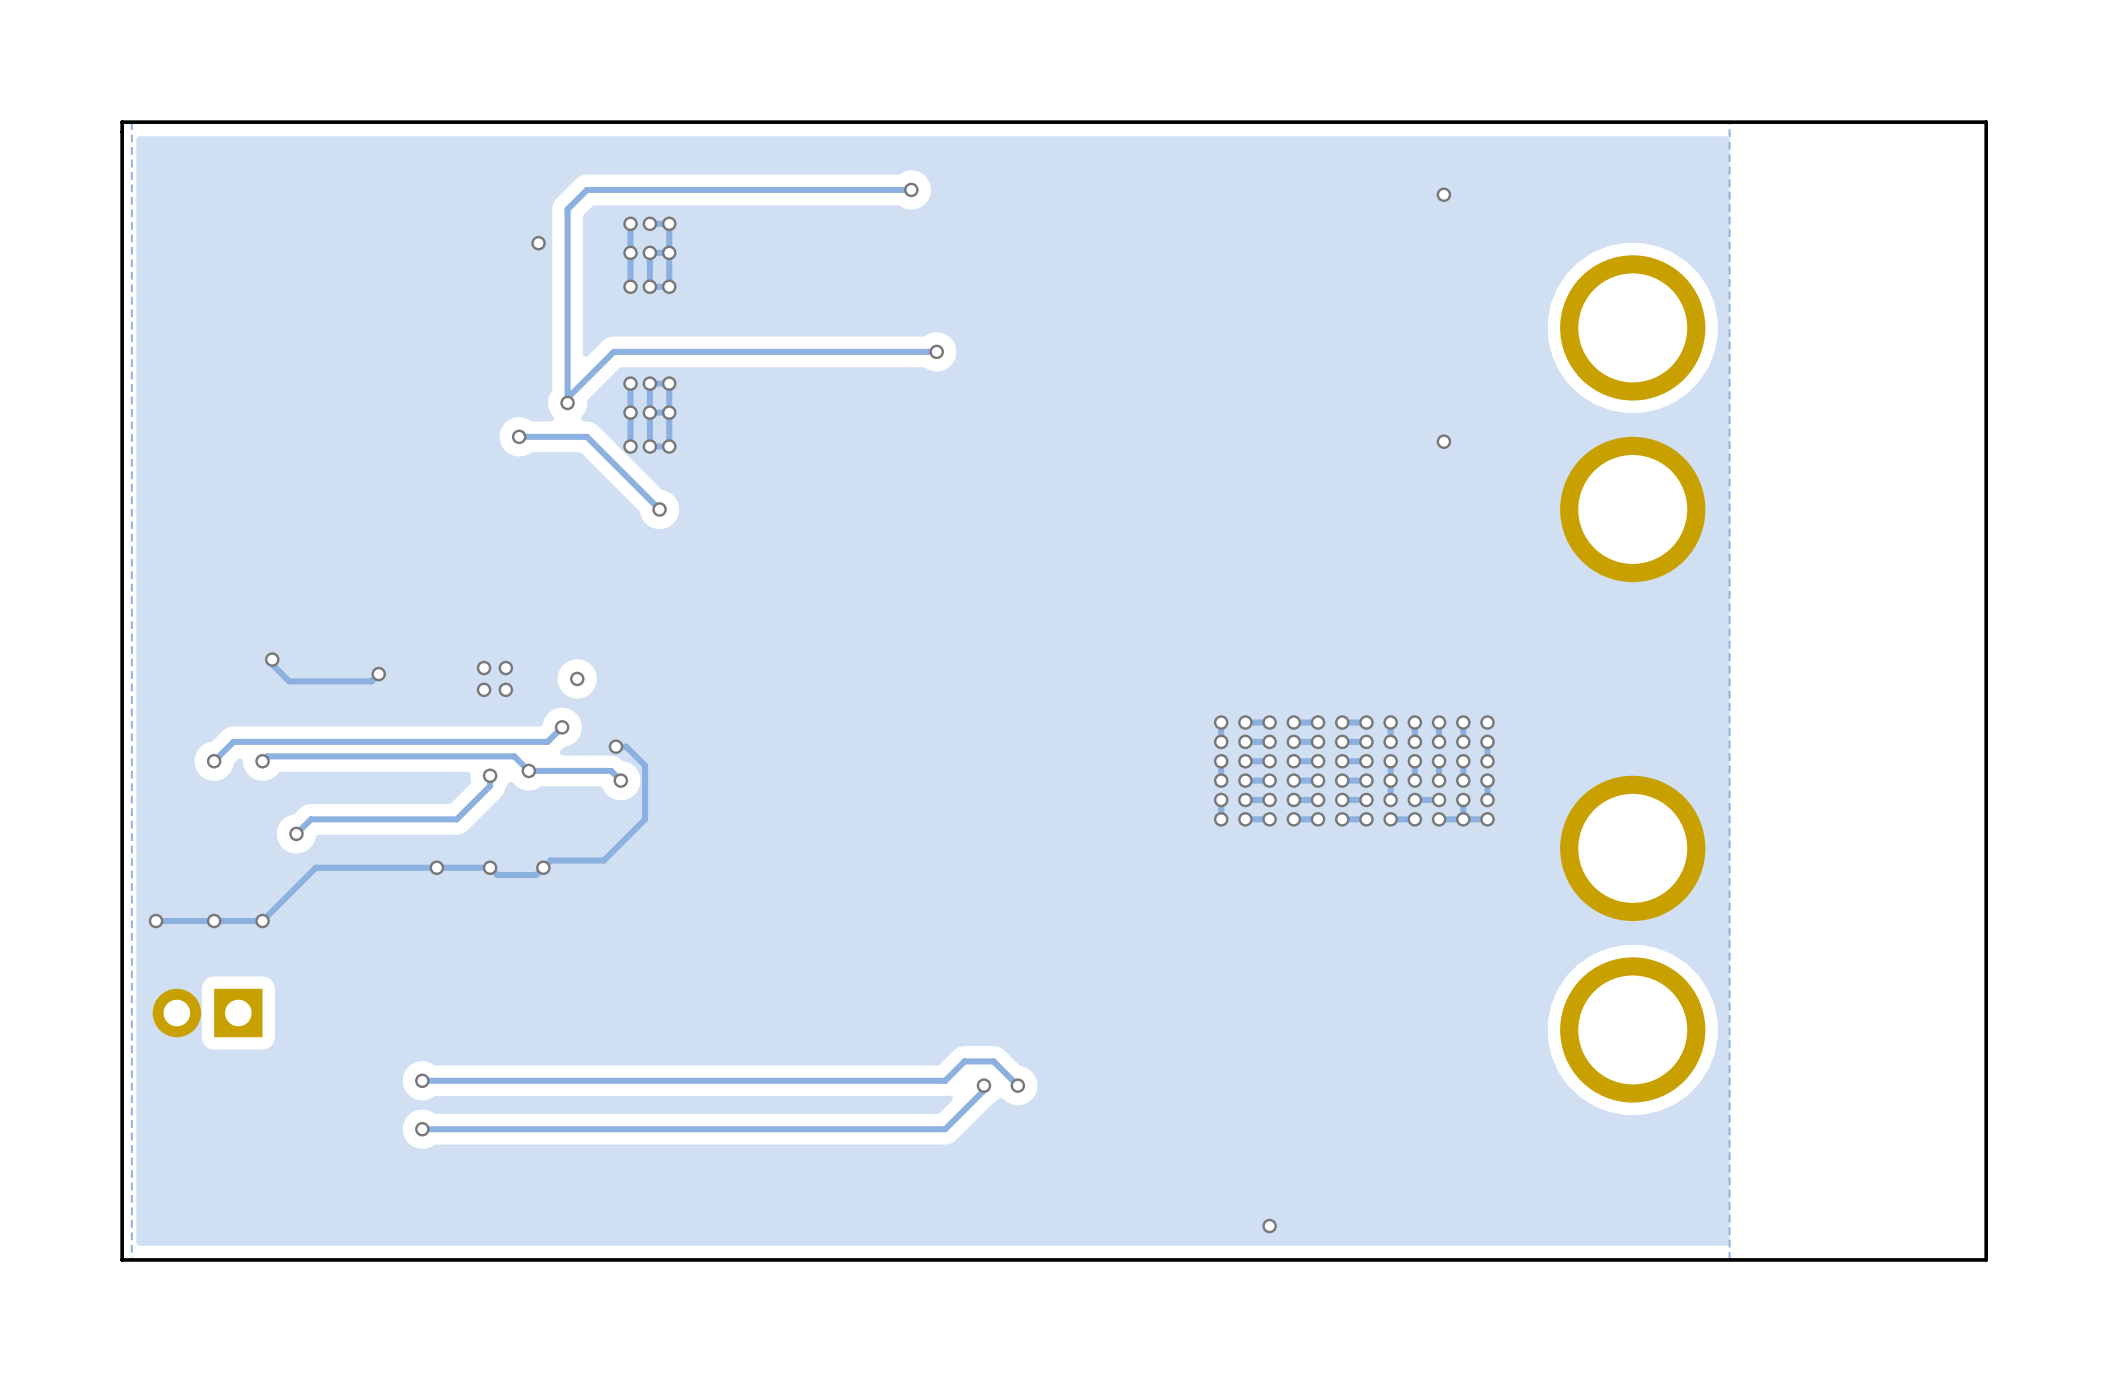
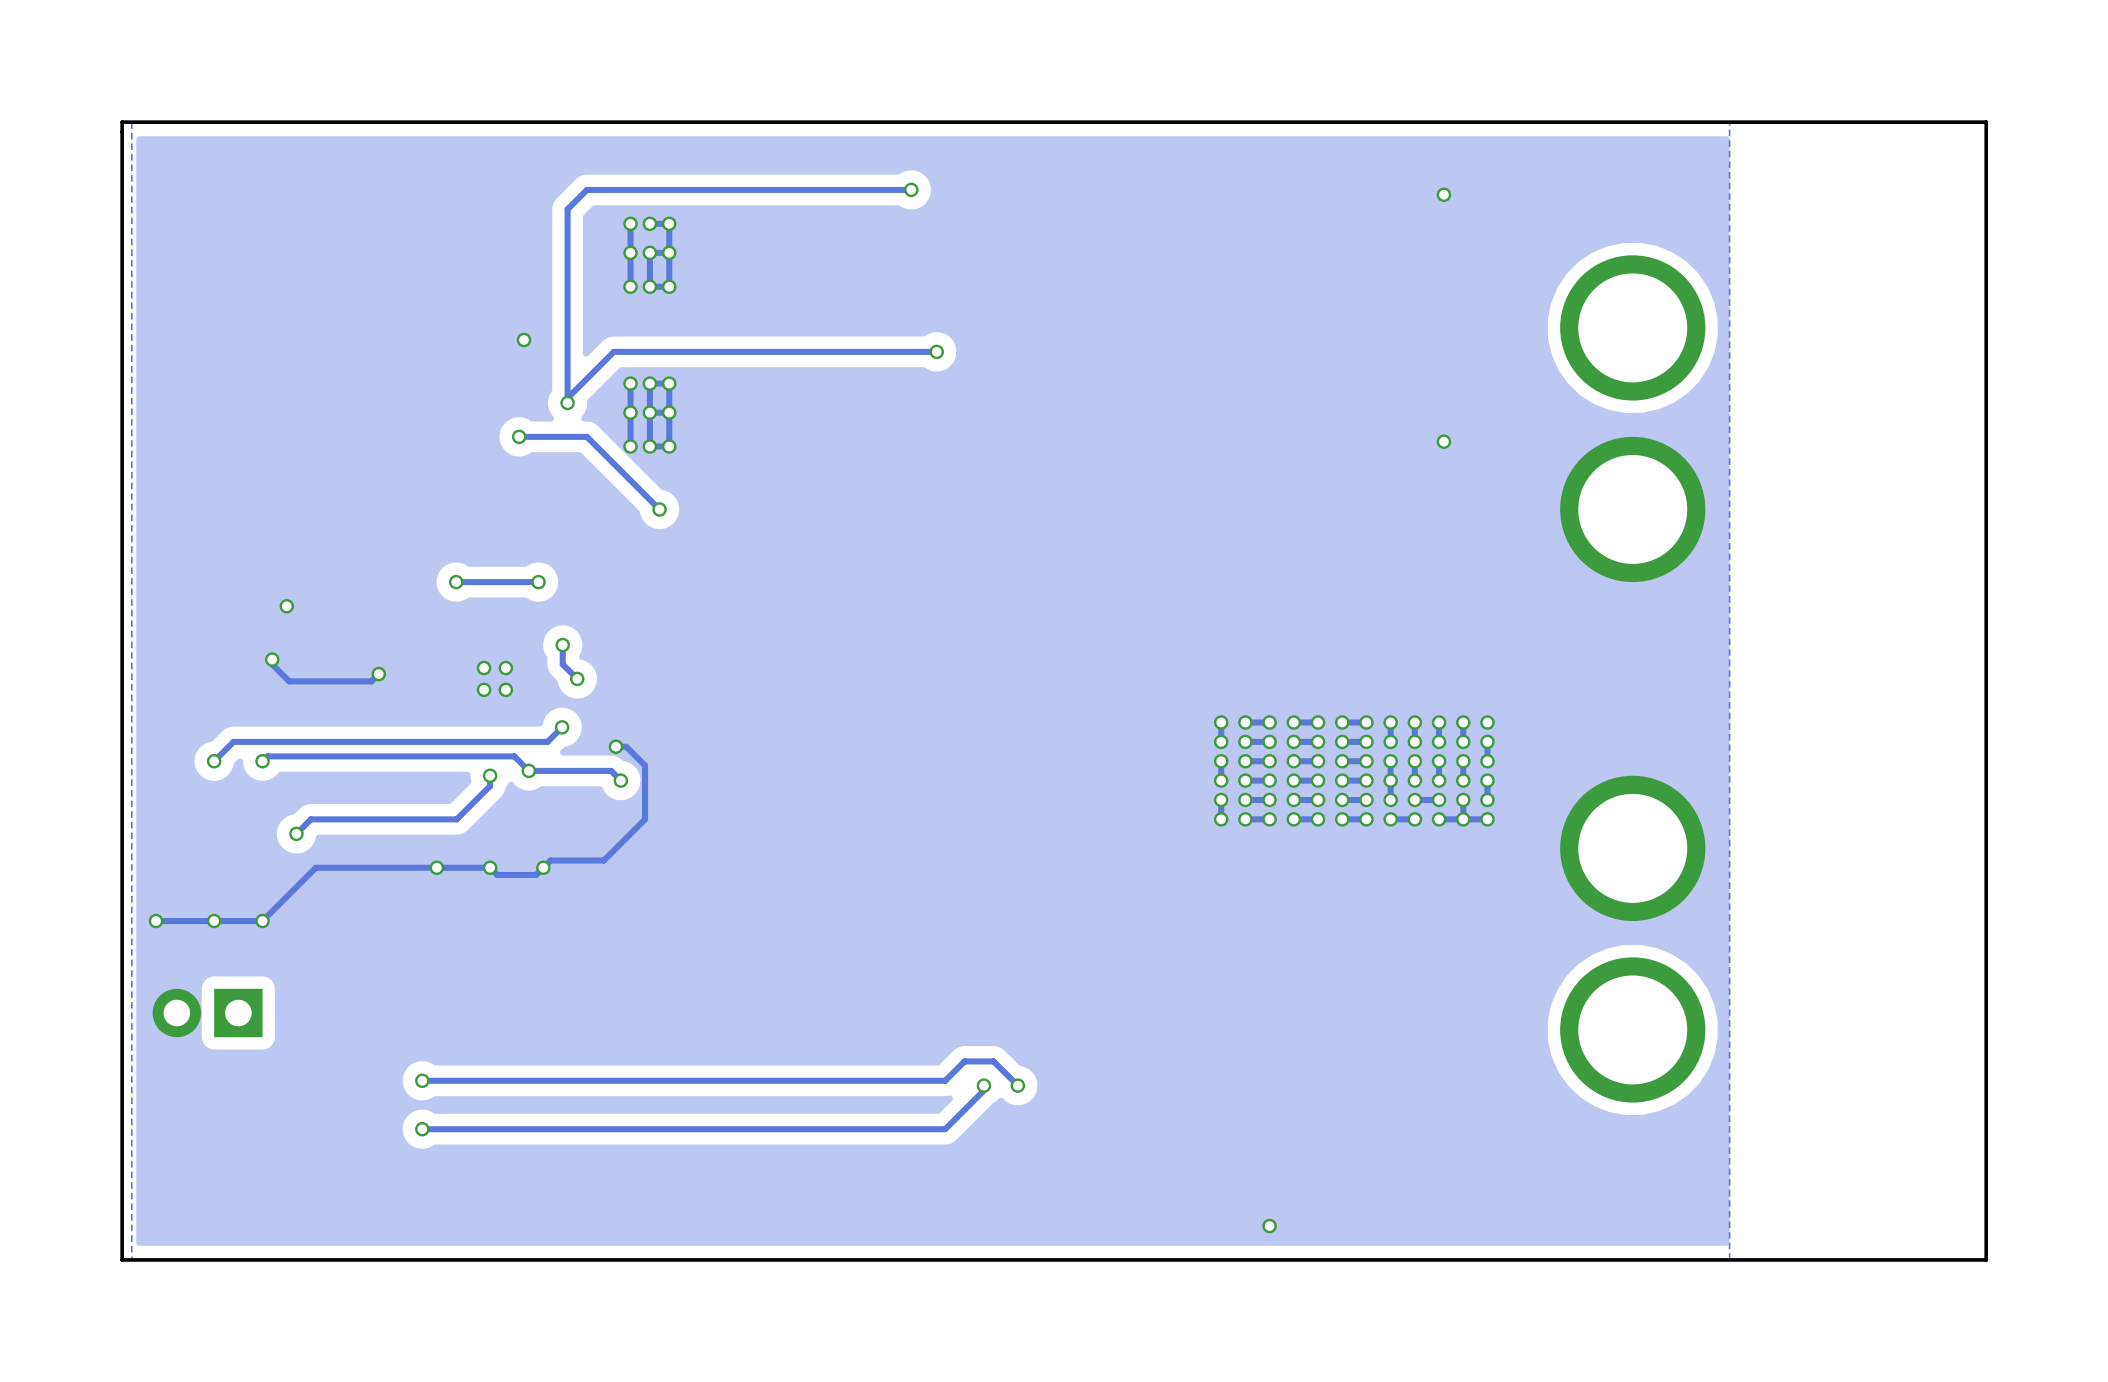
via position: (538, 243) -> (524, 340)
via: none -> (456, 582)
track: none -> (538, 582) (456, 582)
via: none -> (538, 582)
via: none -> (286, 606)
track: none -> (562, 645) (562, 664) (577, 678)
via: none -> (562, 645)

